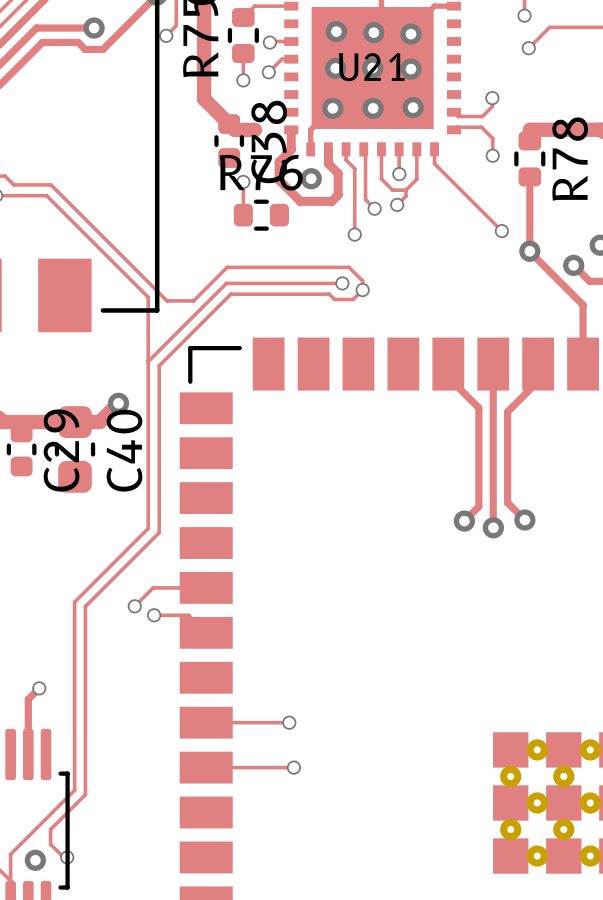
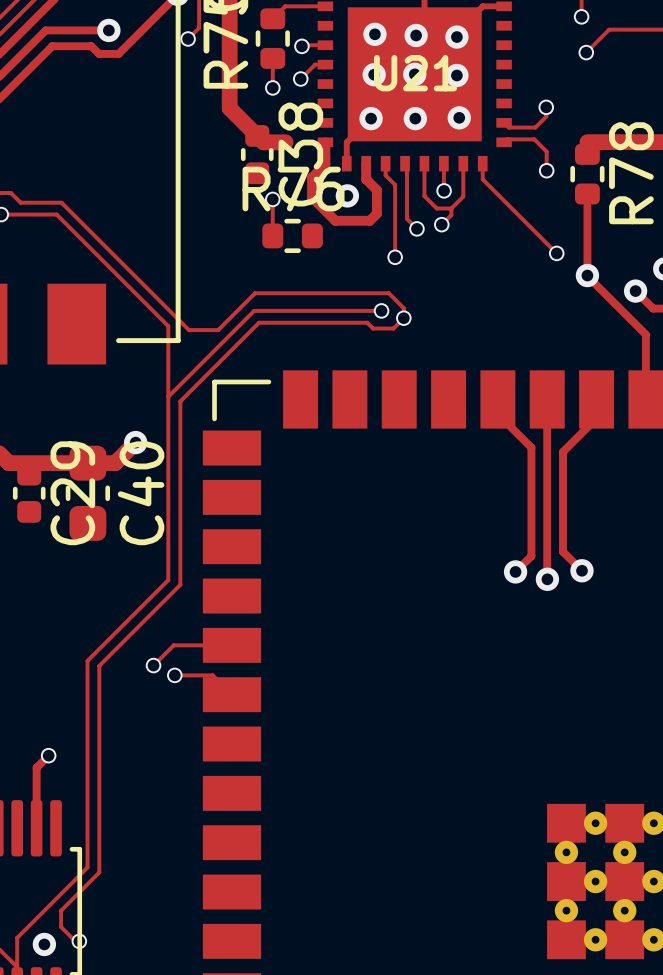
track: (206, 722) (289, 722) -> none
via: (289, 722) -> none
track: (206, 767) (293, 767) -> none
via: (293, 767) -> none

